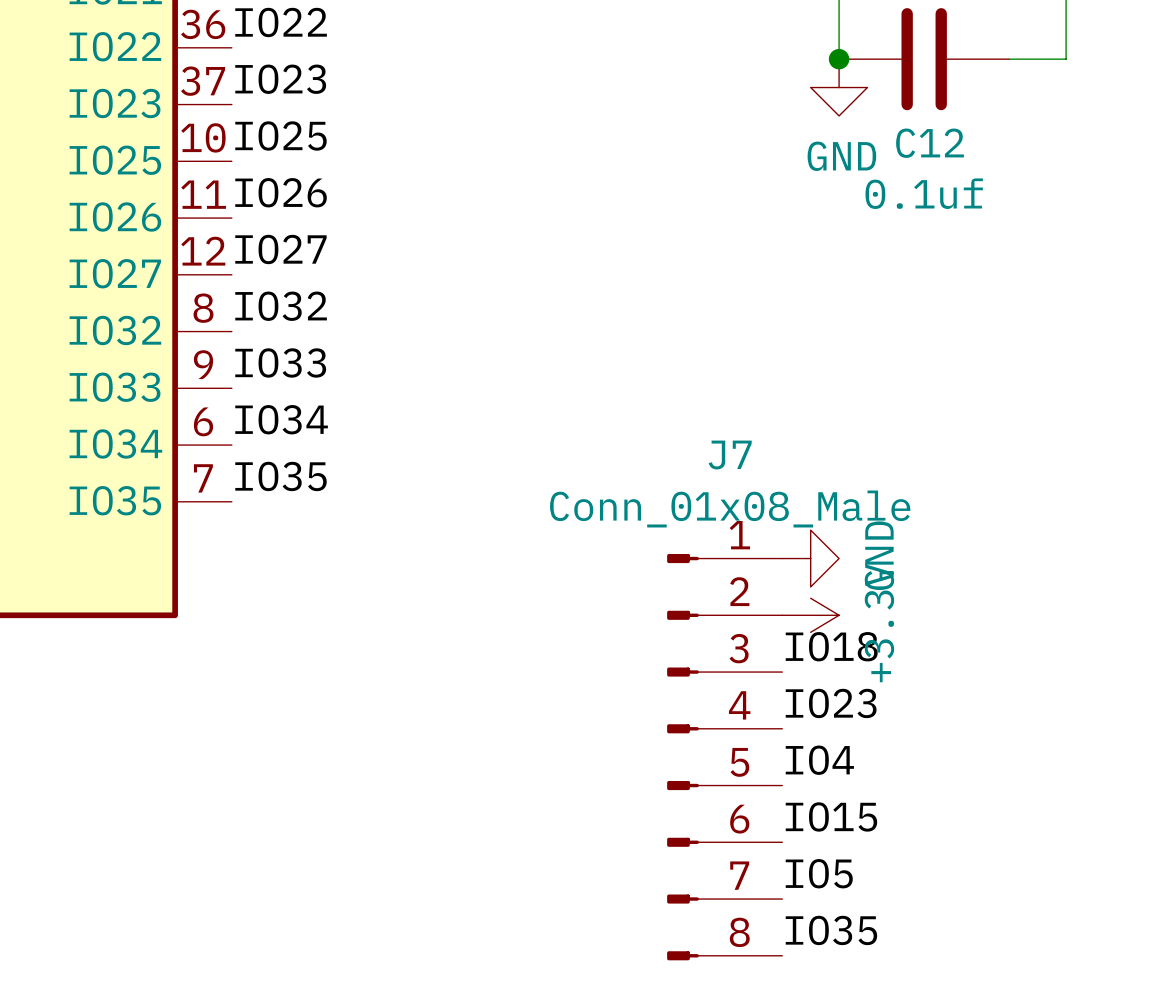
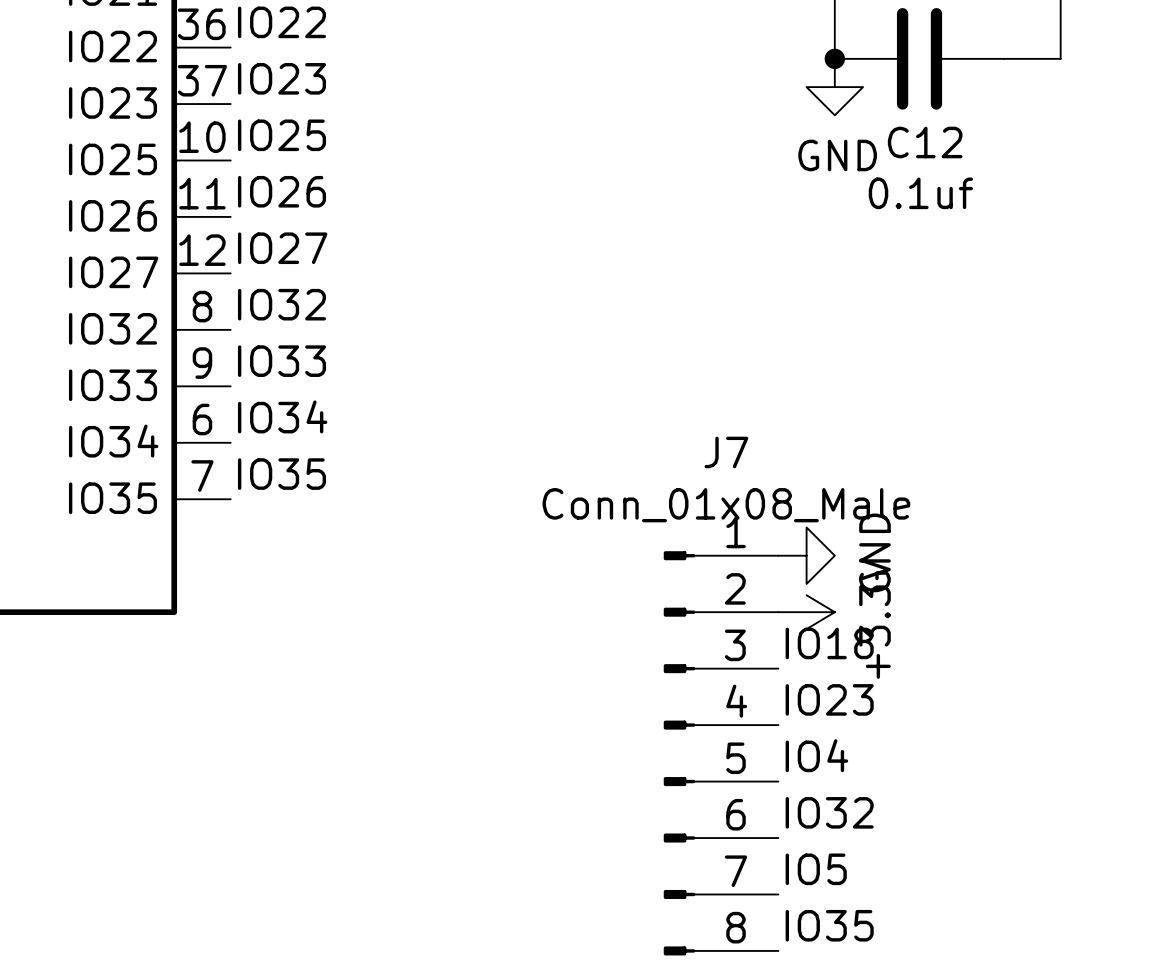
label: IO15 (831, 816) -> IO32 (829, 812)

